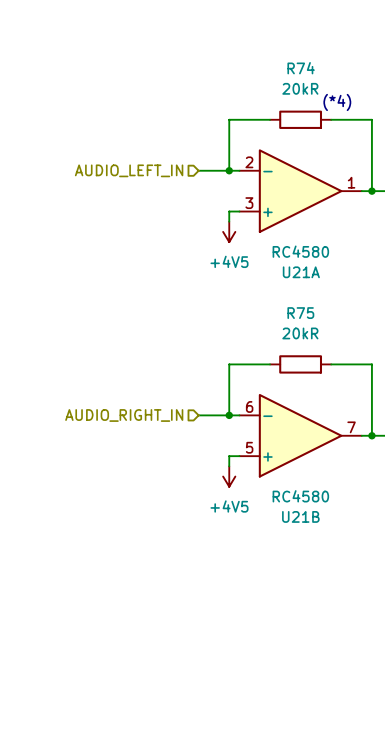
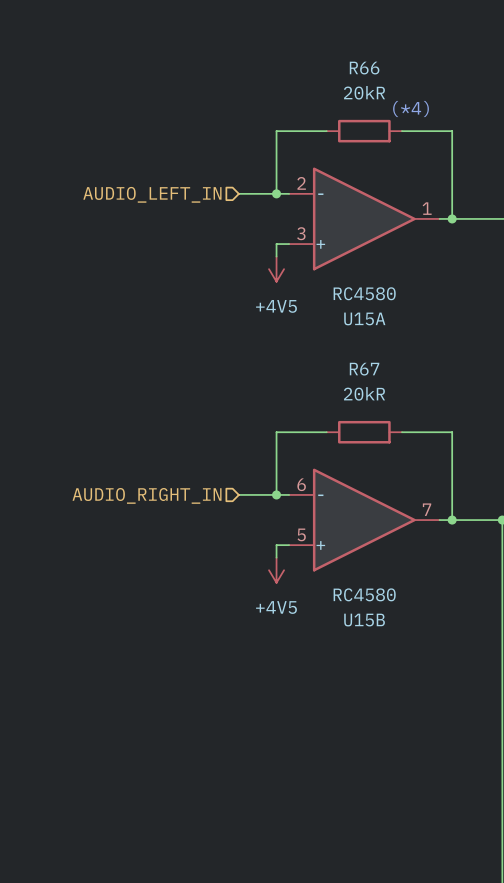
R74 name: R74 (301, 68) -> R66 (364, 68)
U21A name: U21A (301, 272) -> U15A (364, 318)
R75 name: R75 (300, 313) -> R67 (364, 369)
U21B name: U21B (300, 516) -> U15B (364, 620)

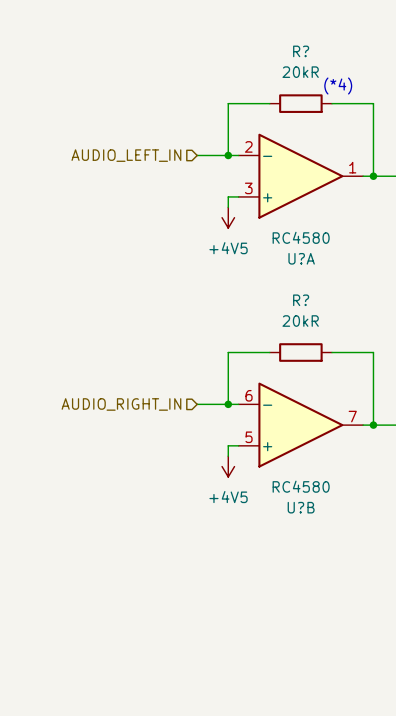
R66 name: R66 (364, 68) -> R? (301, 51)
U15A name: U15A (364, 318) -> U?A (301, 258)
R67 name: R67 (364, 369) -> R? (301, 300)
U15B name: U15B (364, 620) -> U?B (301, 507)

